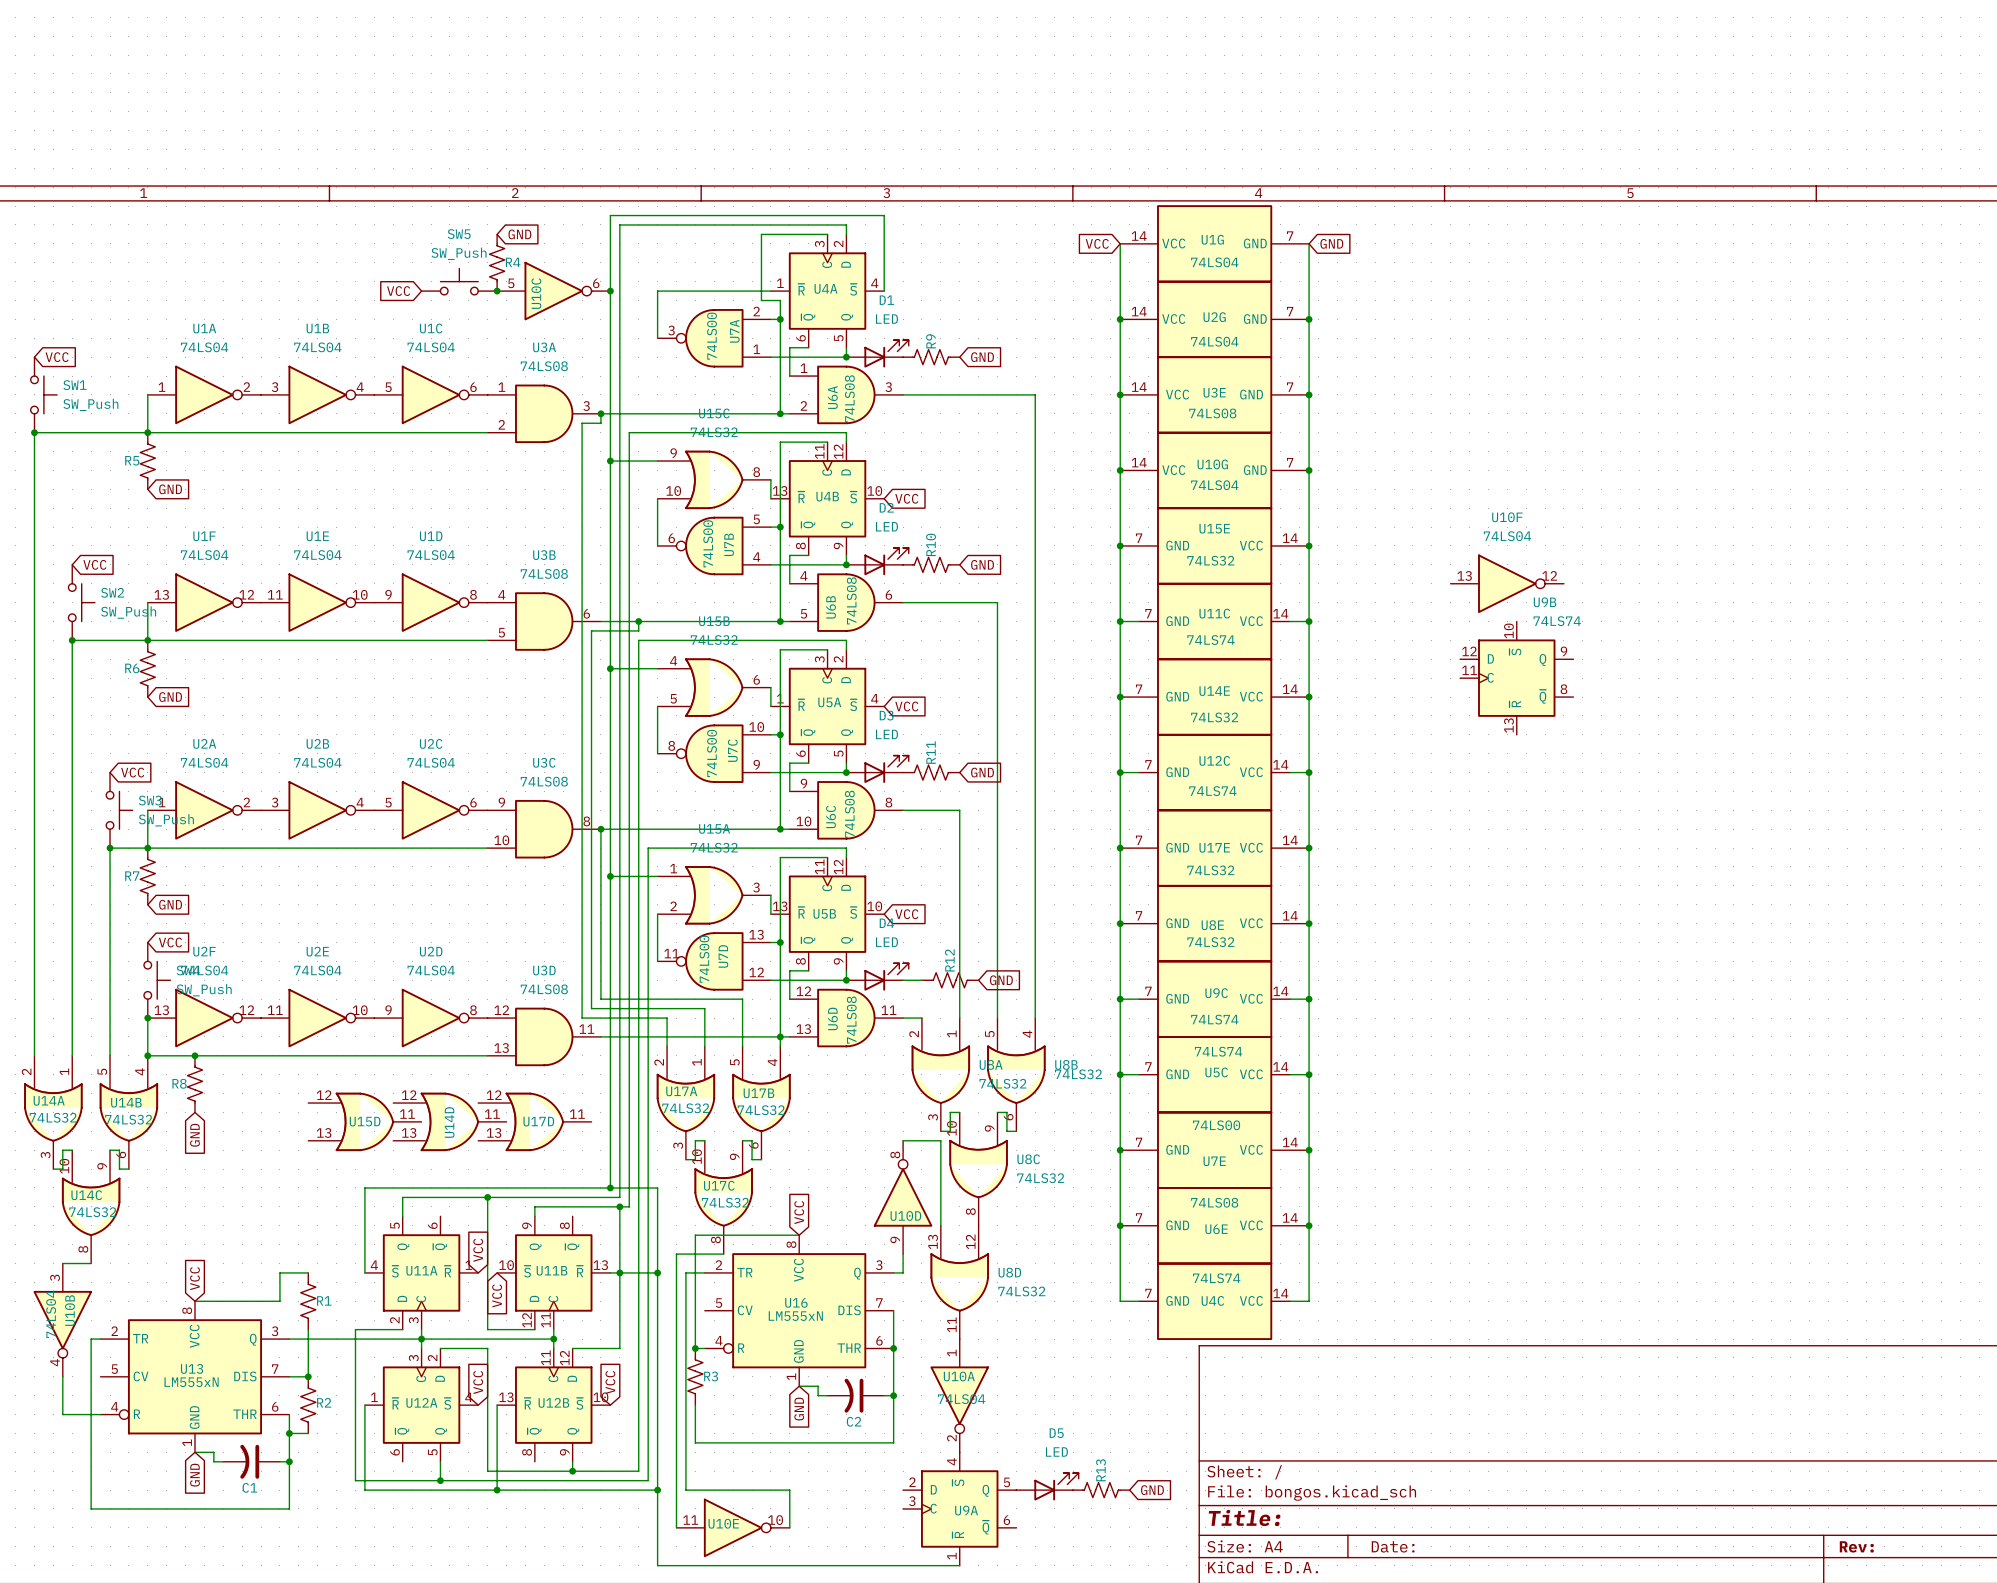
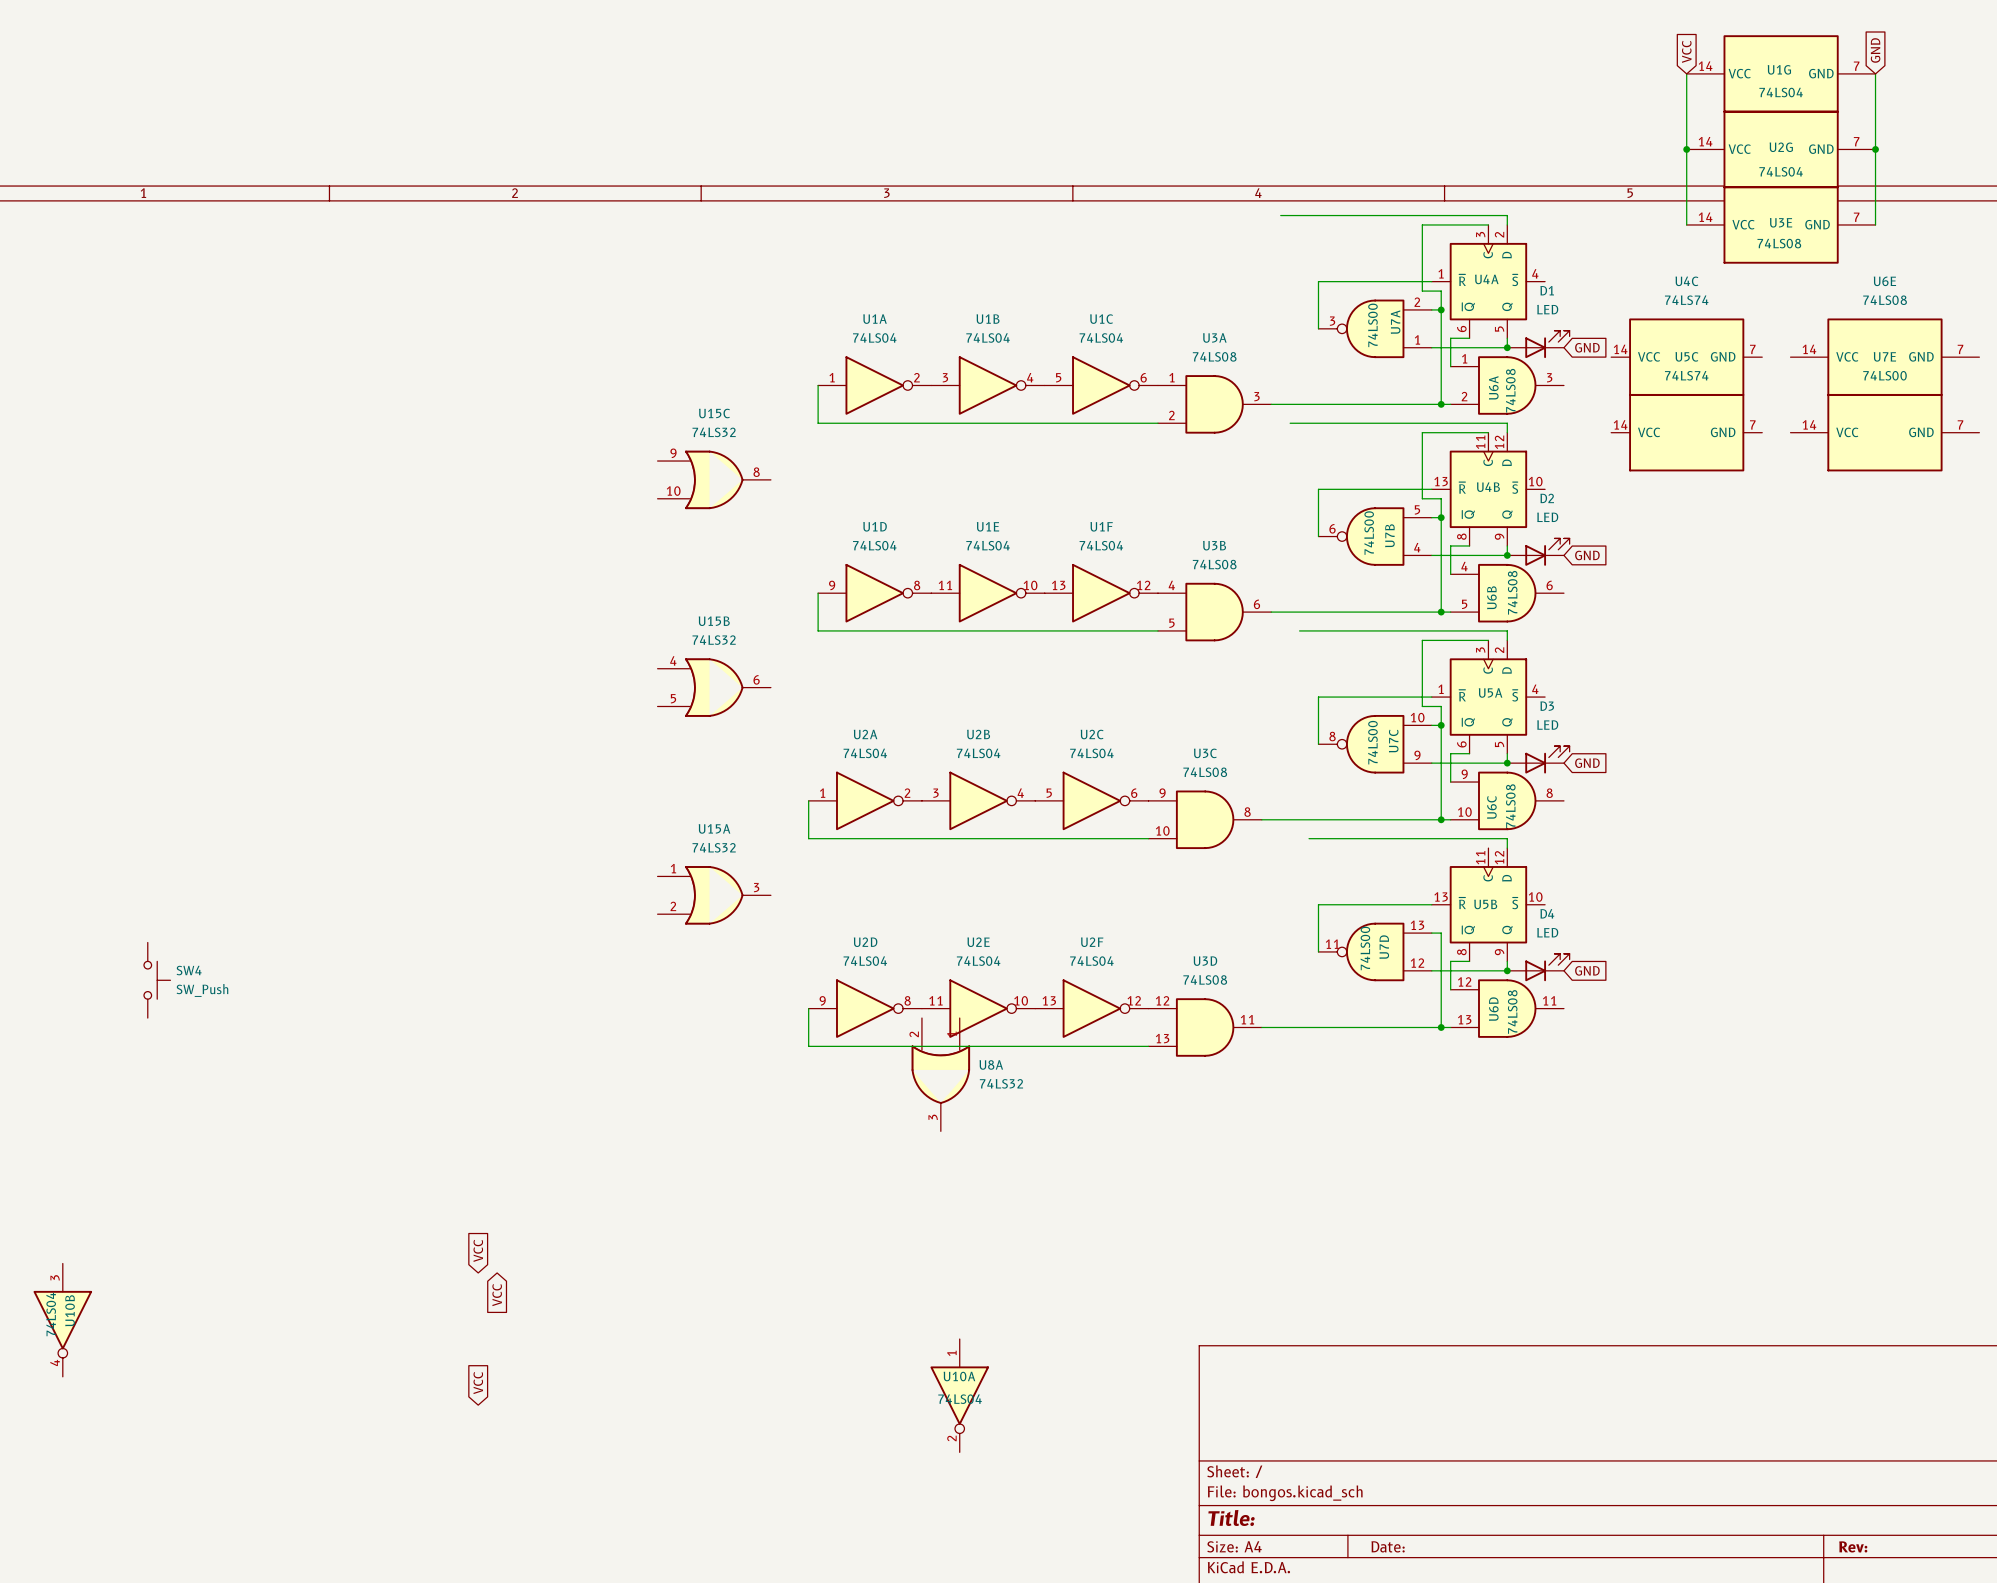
global label: none -> VCC (1686, 51)
global label: none -> GND (1875, 50)
wire: none -> (1686, 73) (1686, 224)
wire: none -> (1875, 73) (1875, 224)
junction: none -> (1686, 149)
junction: none -> (1875, 149)
wire: none -> (1280, 215) (1507, 215) (1507, 224)
wire: none -> (1488, 224) (1422, 224) (1422, 291) (1441, 291) (1441, 404)
global label: GND (519, 234) -> none
wire: (827, 234) (761, 234) (761, 300) (780, 300) (780, 413) -> none
wire: (846, 234) (846, 224) (619, 224) (619, 1197) (402, 1197) (402, 1216) -> none
global label: VCC (1097, 243) -> none
wire: (1120, 243) (1120, 1301) (1139, 1301) -> none
U1G position: (1214, 243) -> (1781, 73)
wire: (1309, 243) (1309, 1301) (1290, 1301) -> none
global label: GND (1331, 243) -> none
R4: (497, 262) -> none
SW5: SW_Push (459, 281) -> none
wire: none -> (1431, 281) (1318, 281) (1318, 328)
global label: VCC (398, 291) -> none
junction: (497, 291) -> none
U10C: (553, 291) -> none
junction: (610, 291) -> none
wire: (770, 291) (657, 291) (657, 338) -> none
U4A position: (827, 291) -> (1488, 281)
wire: (884, 291) (884, 215) (610, 215) (610, 1187) -> none
wire: none -> (1431, 309) (1441, 309)
junction: none -> (1441, 309)
wire: (770, 319) (780, 319) -> none
junction: (780, 319) -> none
junction: (1120, 319) -> none
U2G position: (1214, 319) -> (1781, 149)
junction: (1309, 319) -> none
U7A position: (714, 338) -> (1375, 328)
wire: none -> (1469, 338) (1450, 338) (1450, 366)
wire: none -> (1507, 338) (1507, 347) (1431, 347)
wire: (808, 347) (789, 347) (789, 376) -> none
wire: (846, 347) (846, 357) (770, 357) -> none
junction: none -> (1507, 347)
global label: none -> GND (1587, 347)
D1 position: (877, 353) -> (1538, 344)
global label: VCC (57, 357) -> none
junction: (846, 357) -> none
R9: (931, 357) -> none
global label: GND (982, 357) -> none
wire: none -> (818, 385) (818, 423) (1157, 423)
SW1: SW_Push (43, 394) -> none
wire: (147, 394) (147, 432) -> none
U1A position: (204, 394) -> (874, 385)
U1B position: (317, 394) -> (988, 385)
U1C position: (431, 394) -> (1101, 385)
U6A position: (846, 394) -> (1507, 385)
wire: (903, 394) (1035, 394) (1035, 1018) -> none
junction: (1120, 394) -> none
U3E position: (1214, 394) -> (1781, 224)
junction: (1309, 394) -> none
wire: none -> (1271, 404) (1450, 404)
junction: none -> (1441, 404)
U3A position: (544, 413) -> (1214, 404)
junction: (600, 413) -> none
junction: (780, 413) -> none
wire: (789, 413) (600, 413) (600, 423) (582, 423) (582, 1018) (667, 1018) (667, 1046) -> none
wire: none -> (1290, 423) (1507, 423) (1507, 432)
junction: (34, 432) -> none
junction: (147, 432) -> none
wire: (487, 432) (34, 432) (34, 1055) -> none
wire: none -> (1488, 432) (1422, 432) (1422, 498) (1441, 498) (1441, 612)
wire: (827, 442) (780, 442) (780, 621) -> none
wire: (846, 442) (846, 432) (629, 432) (629, 1206) (534, 1206) (534, 1216) -> none
R5: (147, 461) -> none
wire: (610, 461) (657, 461) -> none
junction: (610, 461) -> none
junction: (1120, 470) -> none
U10G: 74LS04 (1214, 470) -> none
junction: (1309, 470) -> none
wire: (770, 479) (770, 498) -> none
global label: GND (170, 489) -> none
wire: none -> (1431, 489) (1318, 489) (1318, 536)
wire: (657, 498) (657, 545) -> none
U4B position: (827, 498) -> (1488, 489)
global label: VCC (906, 498) -> none
wire: none -> (1431, 517) (1441, 517)
junction: none -> (1441, 517)
wire: (770, 527) (780, 527) -> none
junction: (780, 527) -> none
U7B position: (714, 545) -> (1375, 536)
junction: (1120, 545) -> none
U15E: 74LS32 (1214, 545) -> none
junction: (1309, 545) -> none
wire: none -> (1469, 545) (1450, 545) (1450, 574)
wire: none -> (1507, 545) (1507, 555) (1431, 555)
wire: (808, 555) (789, 555) (789, 583) -> none
wire: (846, 555) (846, 564) (770, 564) -> none
junction: none -> (1507, 555)
global label: none -> GND (1587, 555)
D2 position: (877, 561) -> (1538, 552)
global label: VCC (94, 564) -> none
junction: (846, 564) -> none
R10: (931, 564) -> none
global label: GND (982, 564) -> none
U10F: 74LS04 (1507, 583) -> none
wire: none -> (818, 593) (818, 630) (1157, 630)
SW2: SW_Push (81, 602) -> none
wire: (147, 602) (147, 640) -> none
U1F position: (204, 602) -> (1101, 593)
U1E position: (317, 602) -> (988, 593)
U1D position: (431, 602) -> (874, 593)
U6B position: (846, 602) -> (1507, 593)
wire: (903, 602) (997, 602) (997, 1018) -> none
wire: none -> (1271, 612) (1450, 612)
junction: none -> (1441, 612)
U3B position: (544, 621) -> (1214, 612)
wire: (600, 621) (789, 621) -> none
wire: (638, 621) (638, 630) (591, 630) (591, 1008) (704, 1008) (704, 1046) -> none
junction: (638, 621) -> none
junction: (780, 621) -> none
wire: (1120, 621) (1139, 621) -> none
junction: (1120, 621) -> none
U11C: 74LS74 (1214, 621) -> none
wire: (1290, 621) (1309, 621) -> none
junction: (1309, 621) -> none
wire: none -> (1299, 630) (1507, 630) (1507, 640)
junction: (72, 640) -> none
junction: (147, 640) -> none
wire: (487, 640) (72, 640) (72, 1055) -> none
wire: none -> (1488, 640) (1422, 640) (1422, 706) (1441, 706) (1441, 819)
wire: (827, 649) (780, 649) (780, 829) -> none
wire: (846, 649) (846, 640) (638, 640) (638, 1471) (487, 1471) (487, 1348) (440, 1348) -> none
R6: (147, 668) -> none
wire: (610, 668) (657, 668) -> none
junction: (610, 668) -> none
U9B: 74LS74 (1516, 678) -> none
wire: (770, 687) (770, 706) -> none
global label: GND (170, 697) -> none
junction: (1120, 697) -> none
U14E: 74LS32 (1214, 697) -> none
junction: (1309, 697) -> none
wire: none -> (1431, 697) (1318, 697) (1318, 744)
wire: (657, 706) (657, 753) -> none
U5A position: (827, 706) -> (1488, 697)
global label: VCC (906, 706) -> none
wire: none -> (1431, 725) (1441, 725)
junction: none -> (1441, 725)
wire: (770, 734) (780, 734) -> none
junction: (780, 734) -> none
U7C position: (714, 753) -> (1375, 744)
wire: none -> (1469, 753) (1450, 753) (1450, 782)
wire: none -> (1507, 753) (1507, 763) (1431, 763)
wire: (808, 763) (789, 763) (789, 791) -> none
wire: (846, 763) (846, 772) (770, 772) -> none
junction: none -> (1507, 763)
global label: none -> GND (1587, 763)
D3 position: (877, 769) -> (1538, 759)
global label: VCC (132, 772) -> none
junction: (846, 772) -> none
R11: (931, 772) -> none
global label: GND (982, 772) -> none
wire: (1120, 772) (1139, 772) -> none
junction: (1120, 772) -> none
U12C: 74LS74 (1214, 772) -> none
wire: (1290, 772) (1309, 772) -> none
junction: (1309, 772) -> none
wire: none -> (808, 800) (808, 838) (1148, 838)
SW3: SW_Push (119, 810) -> none
wire: (147, 810) (147, 848) -> none
U2A position: (204, 810) -> (865, 800)
U2B position: (317, 810) -> (978, 800)
U2C position: (431, 810) -> (1091, 800)
U6C position: (846, 810) -> (1507, 800)
wire: (903, 810) (959, 810) (959, 1018) -> none
wire: none -> (1261, 819) (1450, 819)
junction: none -> (1441, 819)
U3C position: (544, 829) -> (1205, 819)
junction: (600, 829) -> none
junction: (780, 829) -> none
wire: (789, 829) (600, 829) (600, 999) (742, 999) (742, 1046) -> none
wire: none -> (1309, 838) (1507, 838) (1507, 848)
junction: (110, 848) -> none
junction: (147, 848) -> none
wire: (487, 848) (110, 848) (110, 1055) -> none
junction: (1120, 848) -> none
U17E: 74LS32 (1214, 848) -> none
junction: (1309, 848) -> none
wire: (827, 857) (780, 857) (780, 1046) -> none
wire: (846, 857) (846, 848) (648, 848) (648, 1480) (355, 1480) (355, 1329) (402, 1329) -> none
R7: (147, 876) -> none
wire: (610, 876) (657, 876) -> none
junction: (610, 876) -> none
wire: (770, 895) (770, 914) -> none
global label: GND (170, 904) -> none
wire: none -> (1431, 904) (1318, 904) (1318, 951)
wire: (657, 914) (657, 961) -> none
U5B position: (827, 914) -> (1488, 904)
global label: VCC (906, 914) -> none
junction: (1120, 923) -> none
U8E: 74LS32 (1214, 923) -> none
junction: (1309, 923) -> none
wire: none -> (1431, 933) (1441, 933) (1441, 1027)
global label: VCC (170, 942) -> none
wire: (770, 942) (780, 942) -> none
junction: (780, 942) -> none
U7D position: (714, 961) -> (1375, 951)
wire: none -> (1469, 961) (1450, 961) (1450, 989)
wire: none -> (1507, 961) (1507, 970) (1431, 970)
wire: (808, 970) (789, 970) (789, 999) -> none
wire: (846, 970) (846, 980) (770, 980) -> none
junction: none -> (1507, 970)
global label: none -> GND (1587, 970)
D4 position: (877, 976) -> (1538, 967)
junction: (846, 980) -> none
wire: (903, 980) (921, 980) -> none
R12: (950, 980) -> none
global label: GND (1001, 980) -> none
wire: (1120, 999) (1139, 999) -> none
junction: (1120, 999) -> none
U9C: 74LS74 (1214, 999) -> none
wire: (1290, 999) (1309, 999) -> none
junction: (1309, 999) -> none
wire: none -> (808, 1008) (808, 1046) (1148, 1046)
wire: (147, 1018) (147, 1055) (487, 1055) -> none
junction: (147, 1018) -> none
U2F position: (204, 1018) -> (1091, 1008)
U2E position: (317, 1018) -> (978, 1008)
U2D position: (431, 1018) -> (865, 1008)
U6D position: (846, 1018) -> (1507, 1008)
wire: (903, 1018) (921, 1018) -> none
wire: none -> (1261, 1027) (1450, 1027)
junction: none -> (1441, 1027)
U3D position: (544, 1036) -> (1205, 1027)
wire: (600, 1036) (789, 1036) -> none
junction: (780, 1036) -> none
U5C value position: 74LS74 (1218, 1051) -> 74LS74 (1686, 375)
junction: (147, 1055) -> none
junction: (194, 1055) -> none
U5C name position: U5C (1216, 1072) -> U5C (1686, 356)
U8B: 74LS32 (1016, 1074) -> none
wire: (1120, 1074) (1139, 1074) -> none
junction: (1120, 1074) -> none
U5C rotation: 0° (1214, 1074) -> 180° (1686, 432)
U5C position: (1214, 1074) -> (1686, 432)
wire: (1290, 1074) (1309, 1074) -> none
junction: (1309, 1074) -> none
R8: (194, 1084) -> none
U17A: 74LS32 (685, 1103) -> none
U17B: 74LS32 (761, 1103) -> none
U14A: 74LS32 (53, 1112) -> none
U14B: 74LS32 (128, 1112) -> none
wire: (959, 1112) (950, 1112) (950, 1131) (940, 1131) -> none
wire: (997, 1112) (1006, 1112) (1006, 1131) (1016, 1131) -> none
U15D: (364, 1121) -> none
U14D: (449, 1121) -> none
U17D: (534, 1121) -> none
U7E value position: 74LS00 (1216, 1125) -> 74LS00 (1884, 375)
global label: GND (194, 1135) -> none
wire: (704, 1140) (695, 1140) (695, 1159) (685, 1159) -> none
wire: (742, 1140) (752, 1140) (752, 1159) (761, 1159) -> none
wire: (903, 1140) (940, 1140) (940, 1225) -> none
wire: (72, 1150) (62, 1150) (62, 1169) (53, 1169) -> none
wire: (110, 1150) (119, 1150) (119, 1169) (128, 1169) -> none
junction: (1120, 1150) -> none
U7E rotation: 0° (1214, 1150) -> 180° (1884, 432)
U7E position: (1214, 1150) -> (1884, 432)
junction: (1309, 1150) -> none
U7E name position: U7E (1214, 1161) -> U7E (1884, 356)
U8C: 74LS32 (978, 1169) -> none
junction: (610, 1187) -> none
wire: (487, 1197) (487, 1329) (534, 1329) -> none
junction: (487, 1197) -> none
U17C: 74LS32 (723, 1197) -> none
U10D: (903, 1197) -> none
U6E value position: 74LS08 (1214, 1202) -> 74LS08 (1885, 300)
U14C: 74LS32 (91, 1206) -> none
wire: (619, 1206) (619, 1348) (572, 1348) -> none
junction: (619, 1206) -> none
global label: VCC (799, 1212) -> none
junction: (1120, 1225) -> none
U6E rotation: 0° (1214, 1225) -> 180° (1884, 357)
U6E position: (1214, 1225) -> (1884, 357)
junction: (1309, 1225) -> none
U6E name position: U6E (1216, 1229) -> U6E (1884, 281)
wire: (799, 1235) (695, 1235) (695, 1348) (704, 1348) -> none
wire: (723, 1254) (676, 1254) (676, 1527) -> none
wire: (903, 1254) (903, 1272) (893, 1272) -> none
wire: (62, 1263) (91, 1263) -> none
wire: (308, 1272) (279, 1272) (279, 1301) (194, 1301) -> none
wire: (364, 1272) (364, 1187) (657, 1187) (657, 1565) (959, 1565) -> none
U11A: (421, 1272) -> none
U11B: (553, 1272) -> none
wire: (610, 1272) (657, 1272) -> none
junction: (619, 1272) -> none
junction: (657, 1272) -> none
wire: (704, 1272) (685, 1272) (685, 1490) (789, 1490) (789, 1527) -> none
global label: VCC (194, 1278) -> none
U4C value position: 74LS74 (1216, 1278) -> 74LS74 (1686, 300)
U8D: 74LS32 (959, 1282) -> none
U4C name position: U4C (1212, 1300) -> U4C (1686, 281)
R1: (308, 1301) -> none
U4C rotation: 0° (1214, 1301) -> 180° (1686, 357)
U4C position: (1214, 1301) -> (1686, 357)
U16: LM555xN (799, 1310) -> none
wire: (893, 1310) (893, 1442) (695, 1442) (695, 1405) -> none
wire: (308, 1329) (308, 1376) (289, 1376) -> none
wire: (421, 1329) (421, 1348) -> none
wire: (553, 1329) (553, 1348) -> none
wire: (100, 1339) (91, 1339) (91, 1508) (289, 1508) (289, 1414) -> none
wire: (289, 1339) (553, 1339) -> none
junction: (421, 1339) -> none
junction: (553, 1339) -> none
junction: (695, 1348) -> none
junction: (893, 1348) -> none
wire: (62, 1376) (62, 1414) (100, 1414) -> none
U13: LM555xN (194, 1376) -> none
junction: (308, 1376) -> none
R3: (695, 1376) -> none
global label: VCC (610, 1382) -> none
wire: (799, 1386) (818, 1386) (818, 1395) (827, 1395) -> none
C2: (855, 1395) -> none
wire: (884, 1395) (893, 1395) -> none
junction: (893, 1395) -> none
R2: (308, 1405) -> none
wire: (364, 1405) (364, 1490) (657, 1490) -> none
U12A: (421, 1405) -> none
wire: (497, 1405) (497, 1490) -> none
U12B: (553, 1405) -> none
global label: GND (799, 1409) -> none
wire: (289, 1433) (308, 1433) -> none
junction: (289, 1433) -> none
wire: (194, 1452) (213, 1452) (213, 1461) (223, 1461) -> none
C1: (251, 1461) -> none
wire: (279, 1461) (289, 1461) -> none
junction: (289, 1461) -> none
wire: (440, 1461) (440, 1480) -> none
wire: (572, 1461) (572, 1471) -> none
junction: (572, 1471) -> none
global label: GND (194, 1475) -> none
junction: (440, 1480) -> none
D5: LED (1047, 1486) -> none
junction: (497, 1490) -> none
junction: (657, 1490) -> none
R13: (1101, 1490) -> none
global label: GND (1152, 1490) -> none
U9A: (959, 1508) -> none
U10E: (733, 1527) -> none

